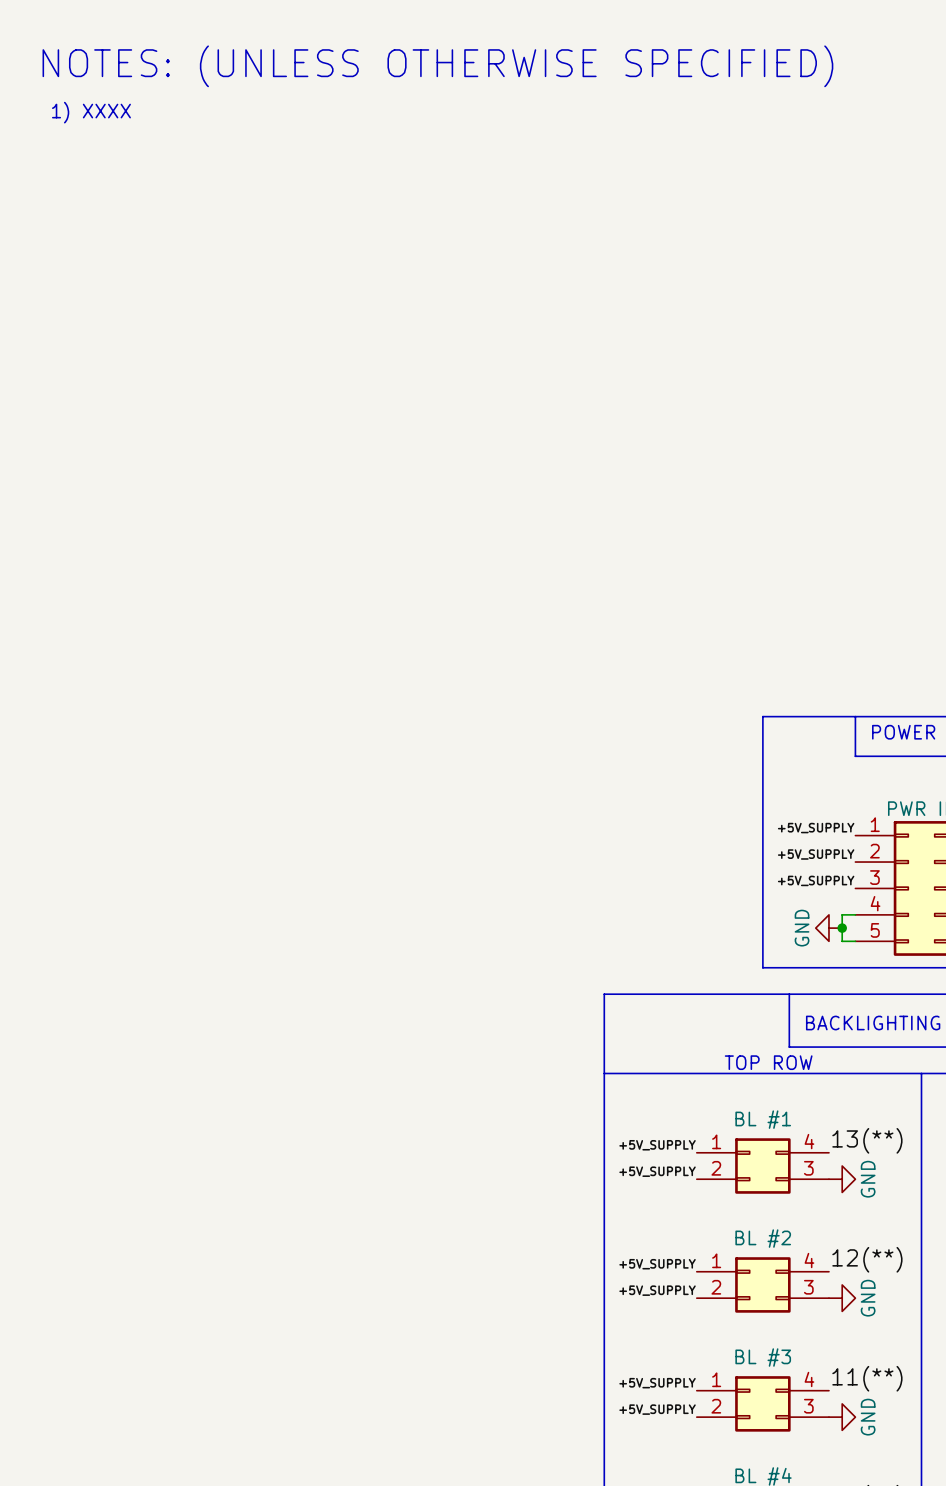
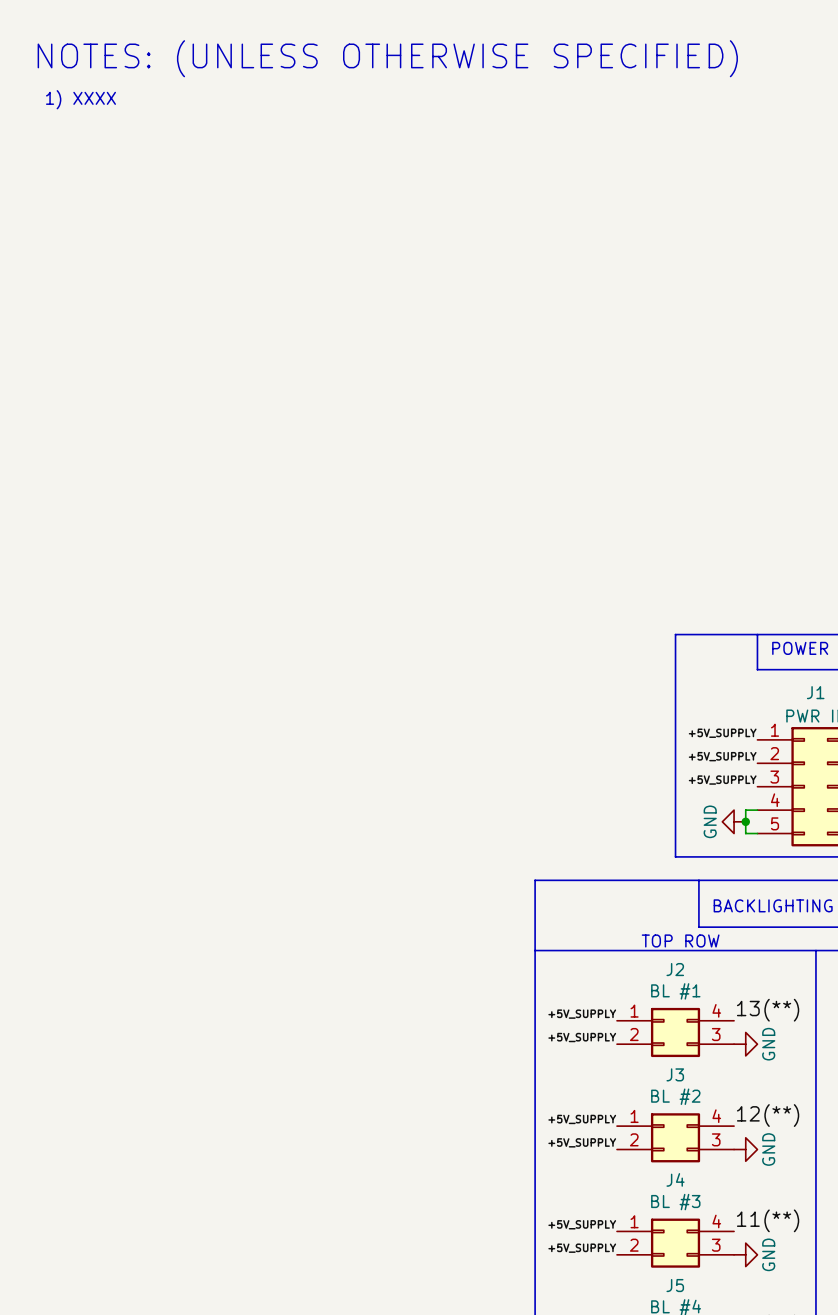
J1 name: none -> J1 (815, 692)
J2 name: none -> J2 (675, 969)
J3 name: none -> J3 (675, 1074)
J4 name: none -> J4 (675, 1179)
J5 name: none -> J5 (675, 1285)

